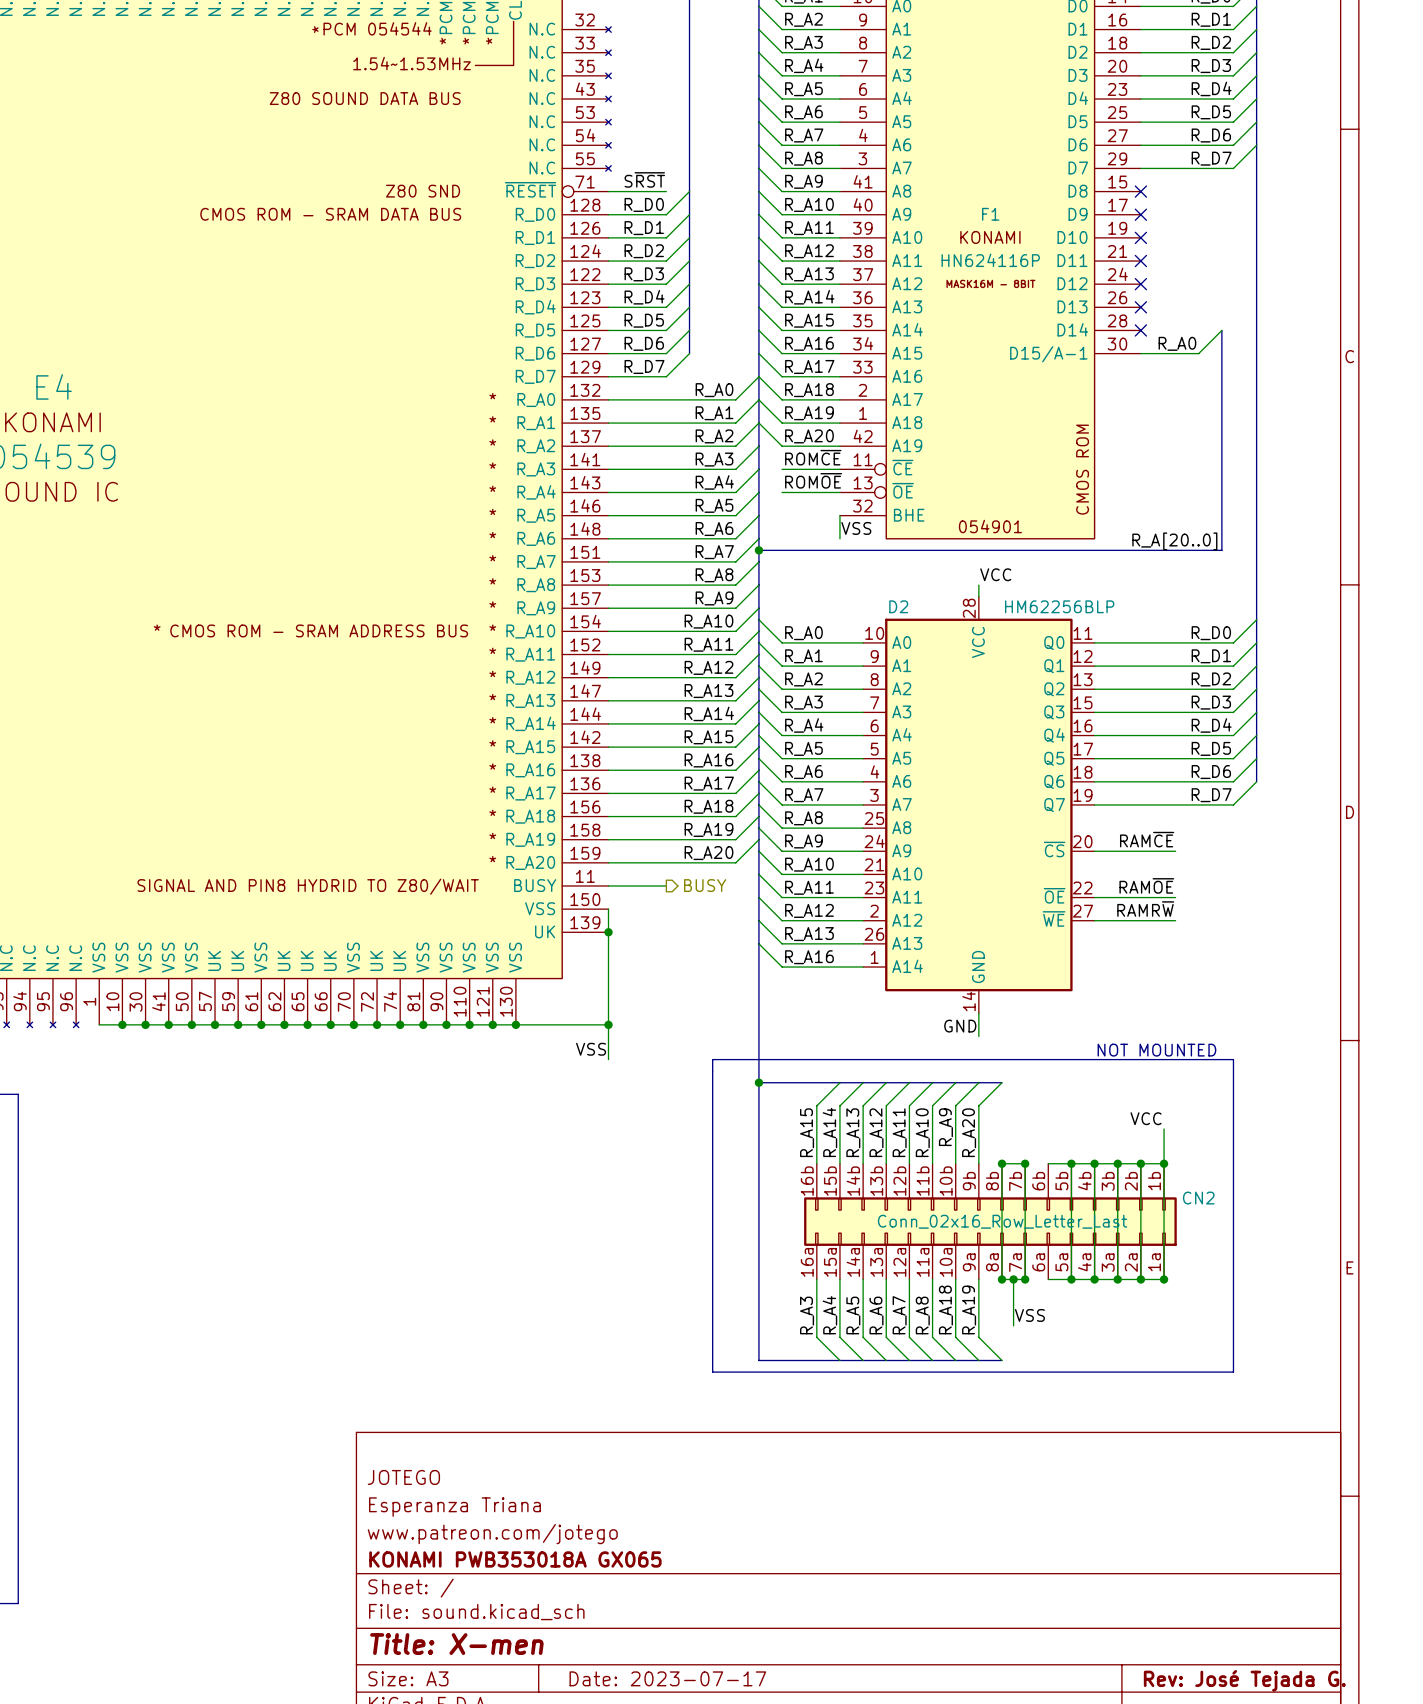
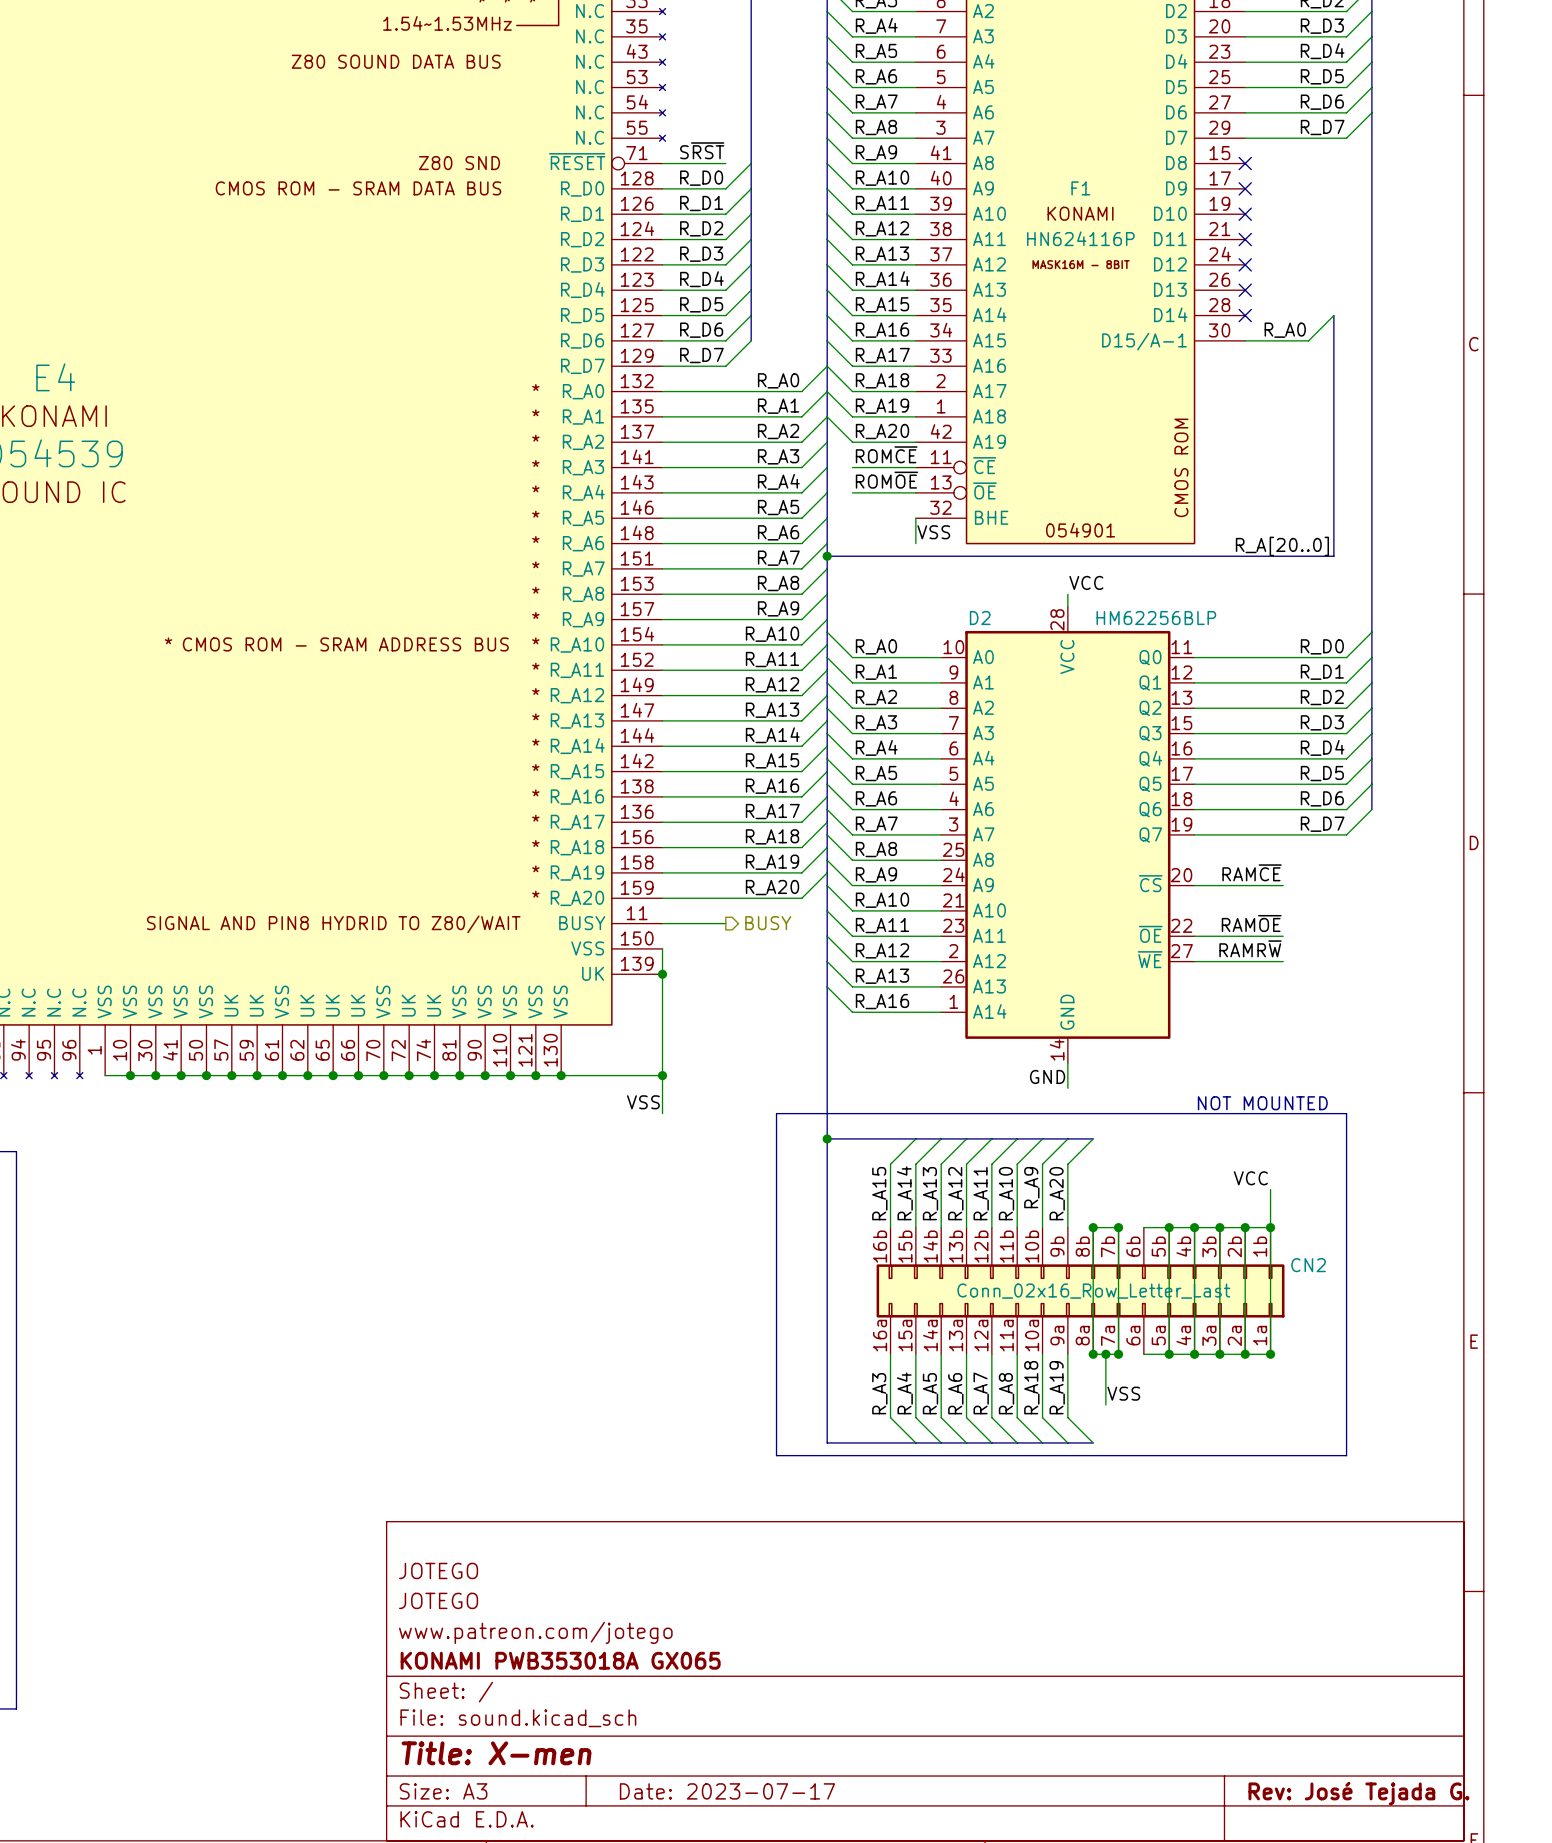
title block: Esperanza Triana (454, 1507) -> JOTEGO (438, 1600)

